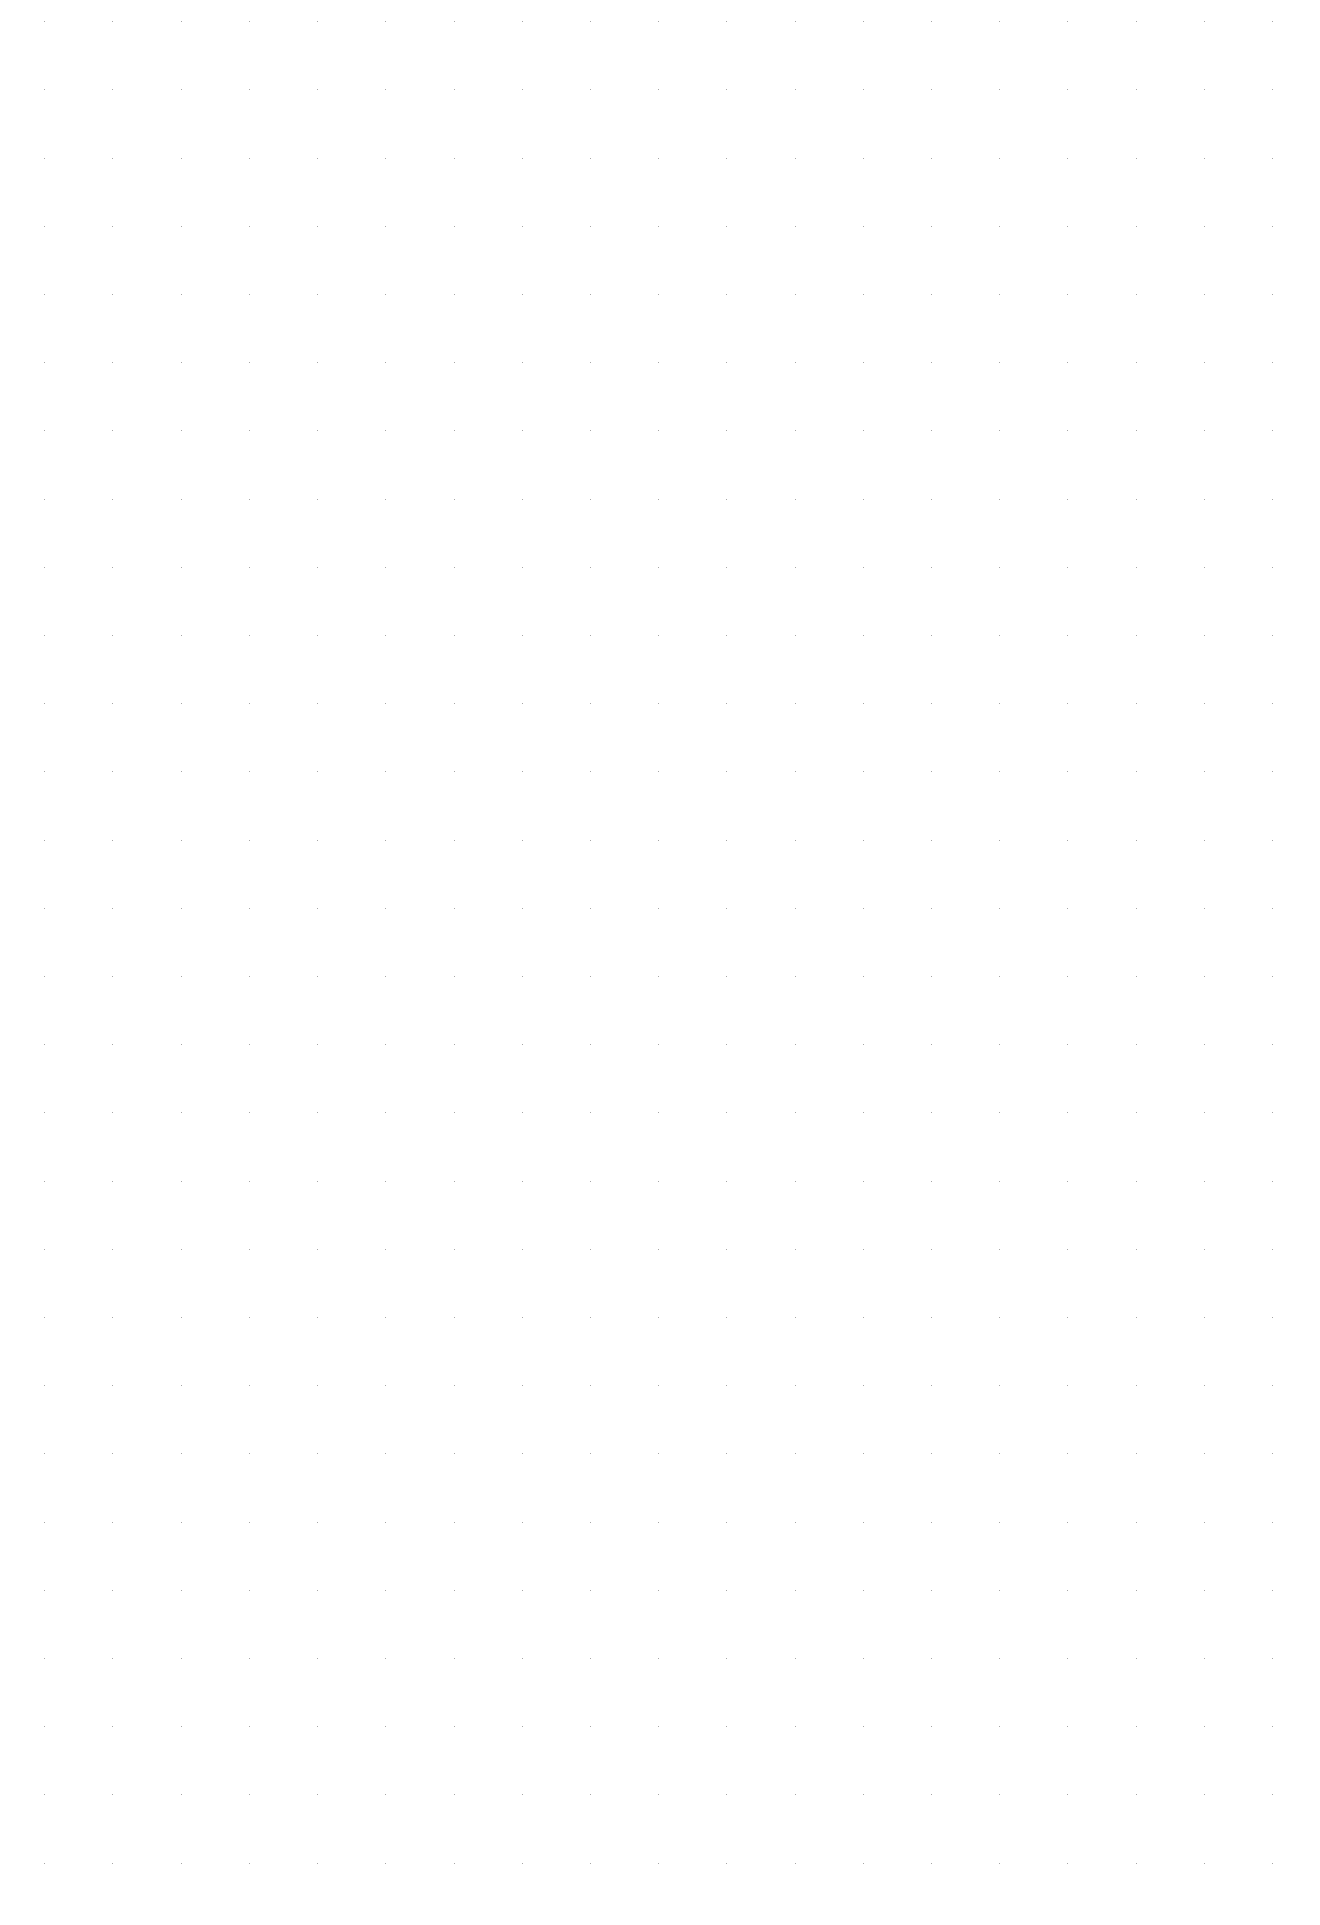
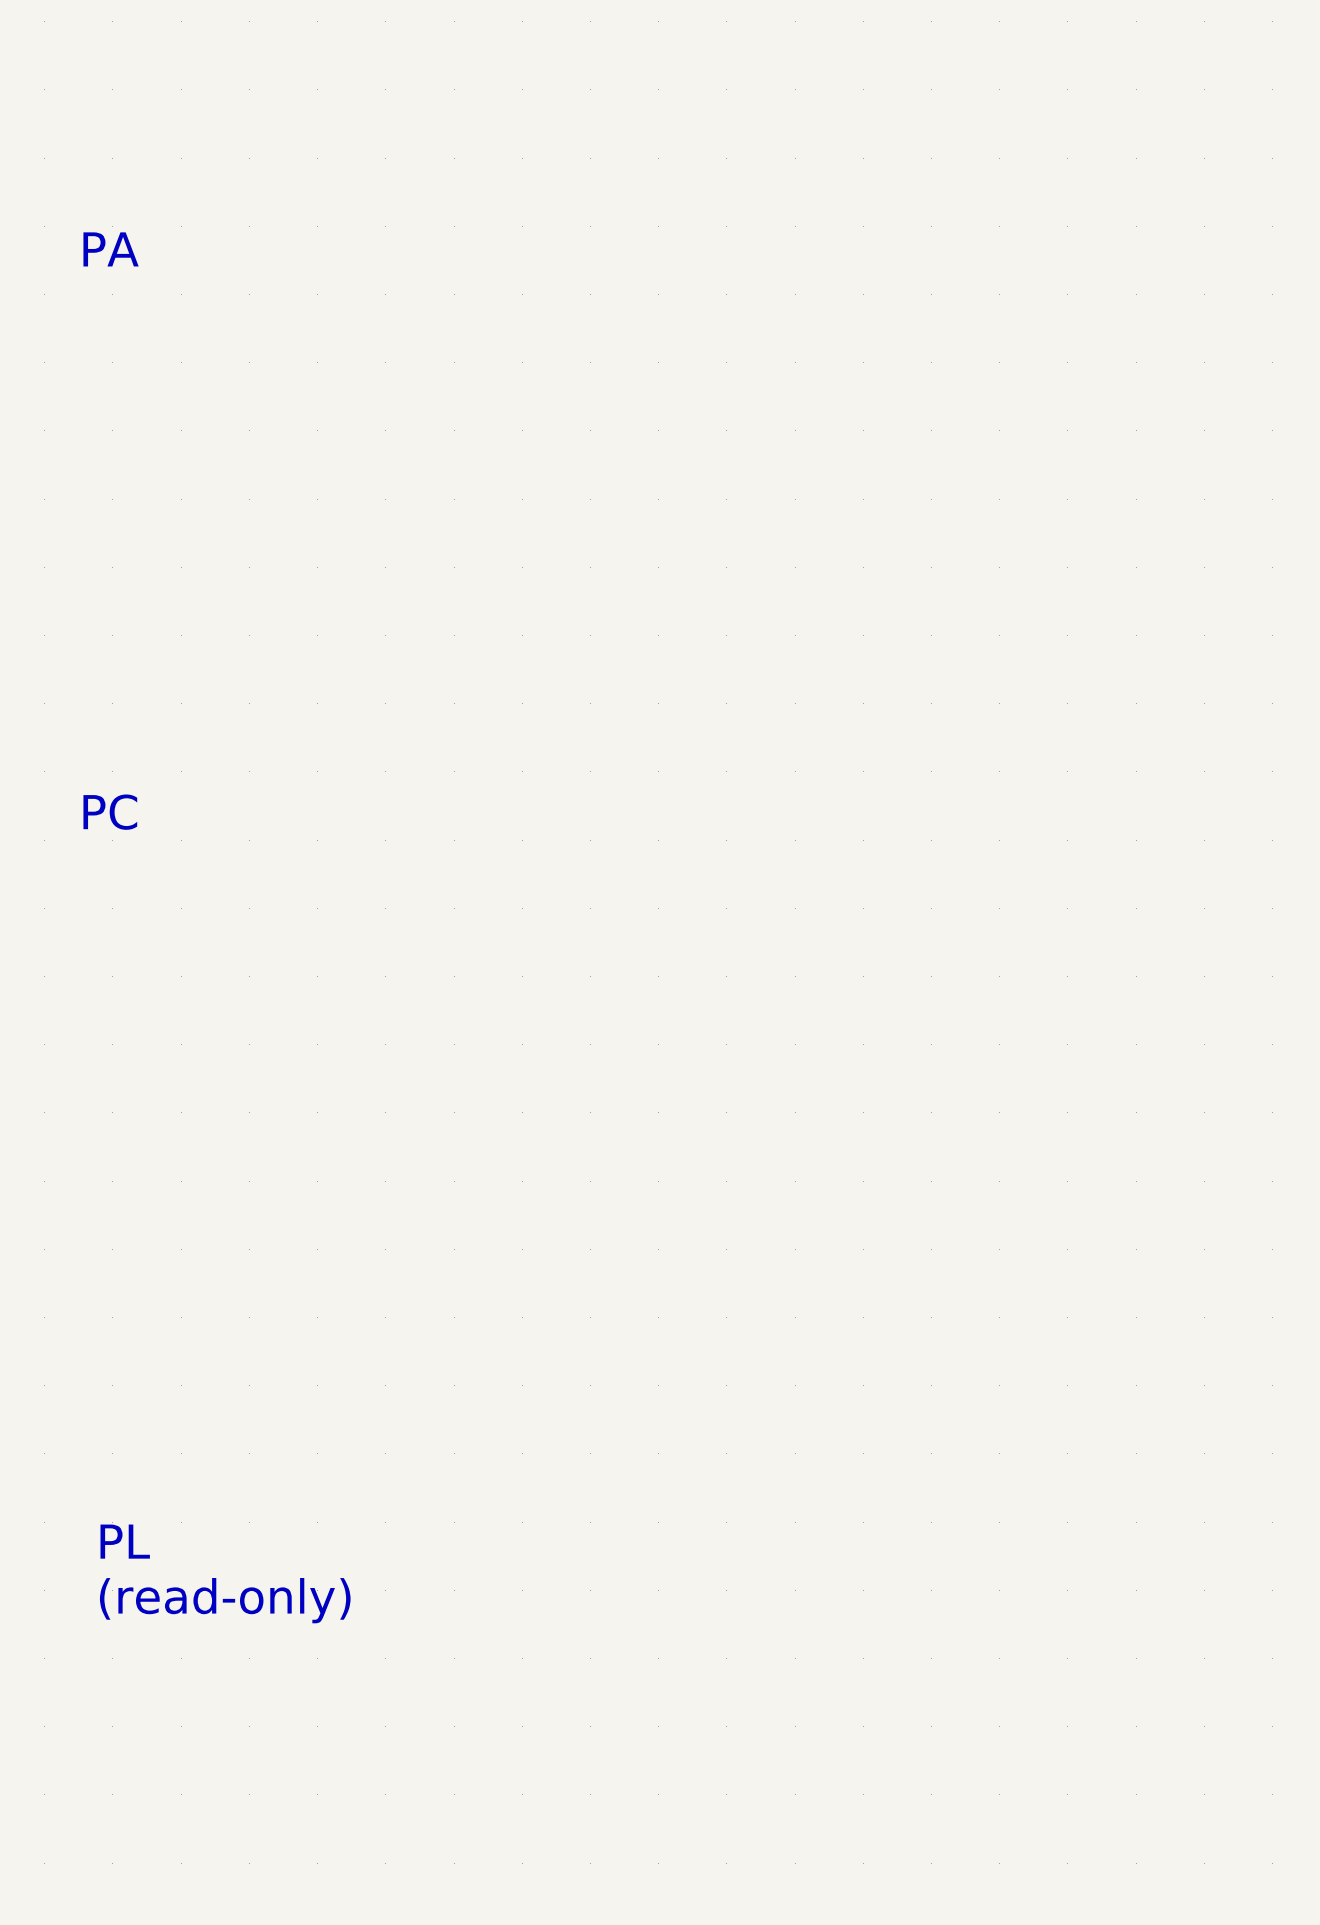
text: none -> PA (111, 249)
text: none -> PC (110, 812)
text: none -> PL (125, 1541)
text: none -> (read-only) (225, 1600)

